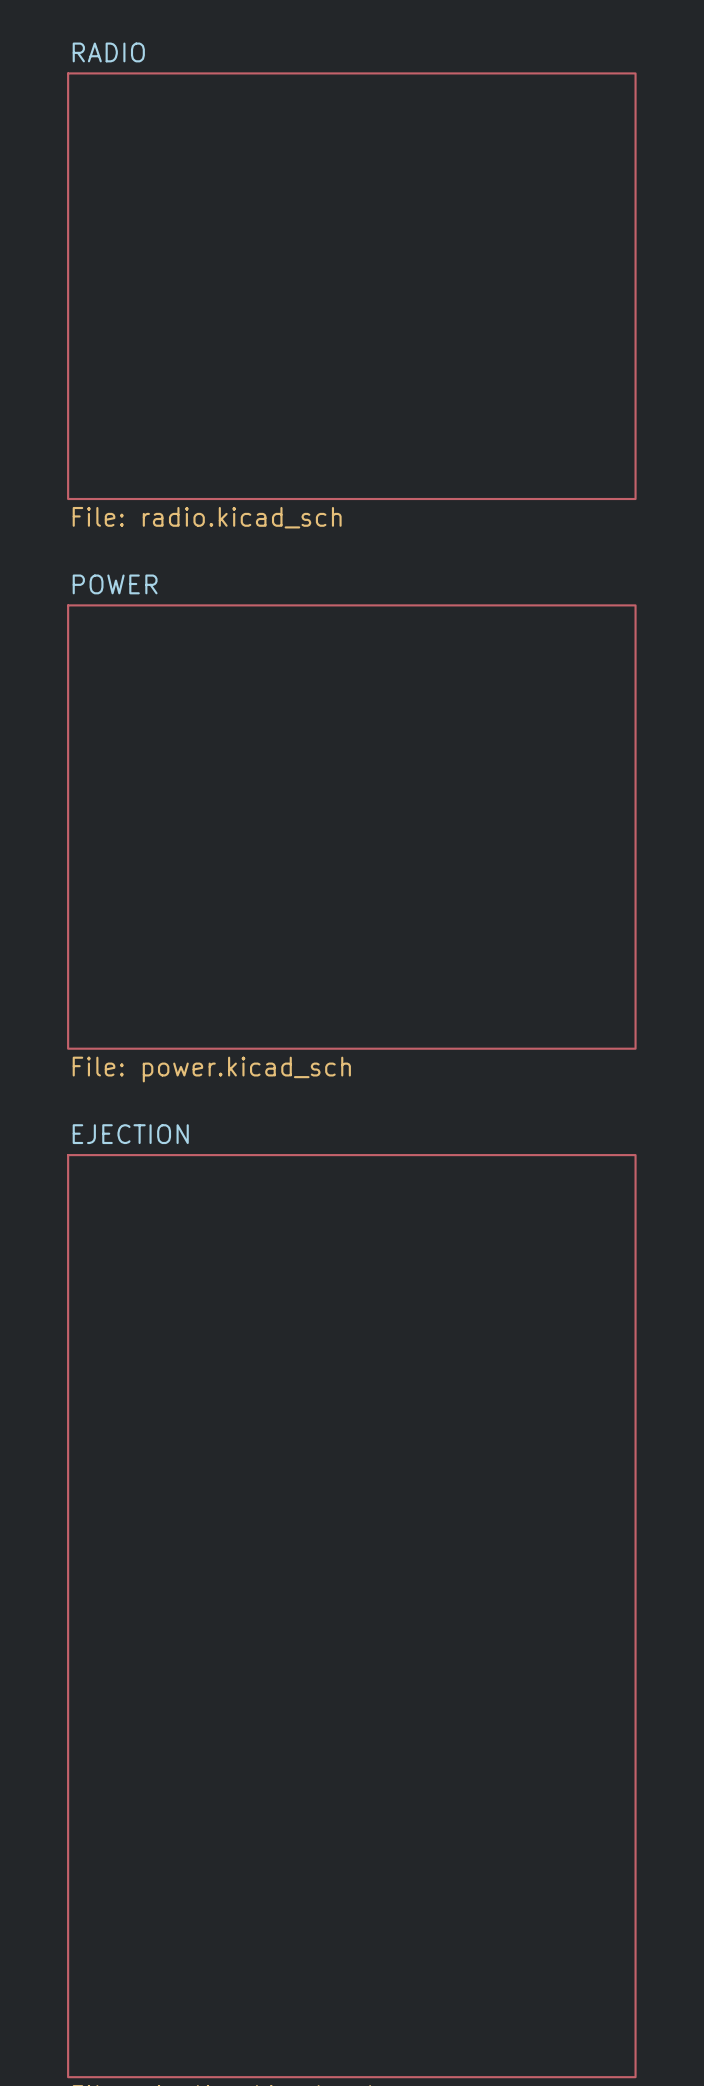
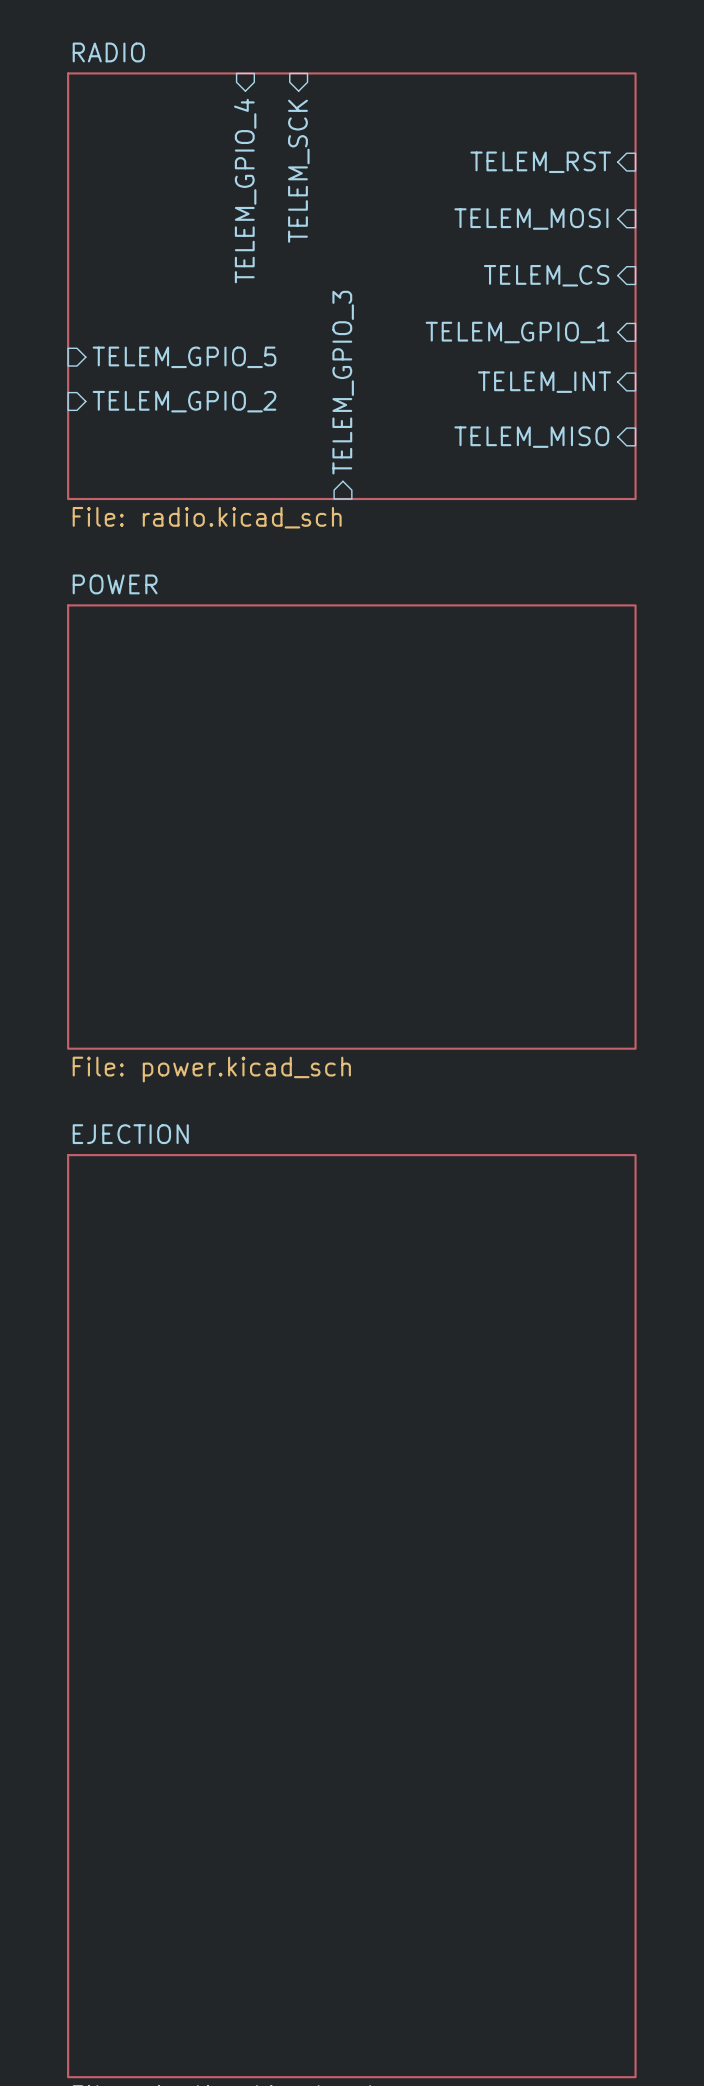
sheet pin: none -> TELEM_RST (540, 162)
sheet pin: none -> TELEM_SCK (298, 171)
sheet pin: none -> TELEM_GPIO_4 (245, 191)
sheet pin: none -> TELEM_MOSI (531, 219)
sheet pin: none -> TELEM_CS (546, 275)
sheet pin: none -> TELEM_GPIO_1 (517, 332)
sheet pin: none -> TELEM_GPIO_5 (184, 357)
sheet pin: none -> TELEM_GPIO_3 (343, 382)
sheet pin: none -> TELEM_INT (544, 382)
sheet pin: none -> TELEM_GPIO_2 (184, 401)
sheet pin: none -> TELEM_MISO (531, 437)

